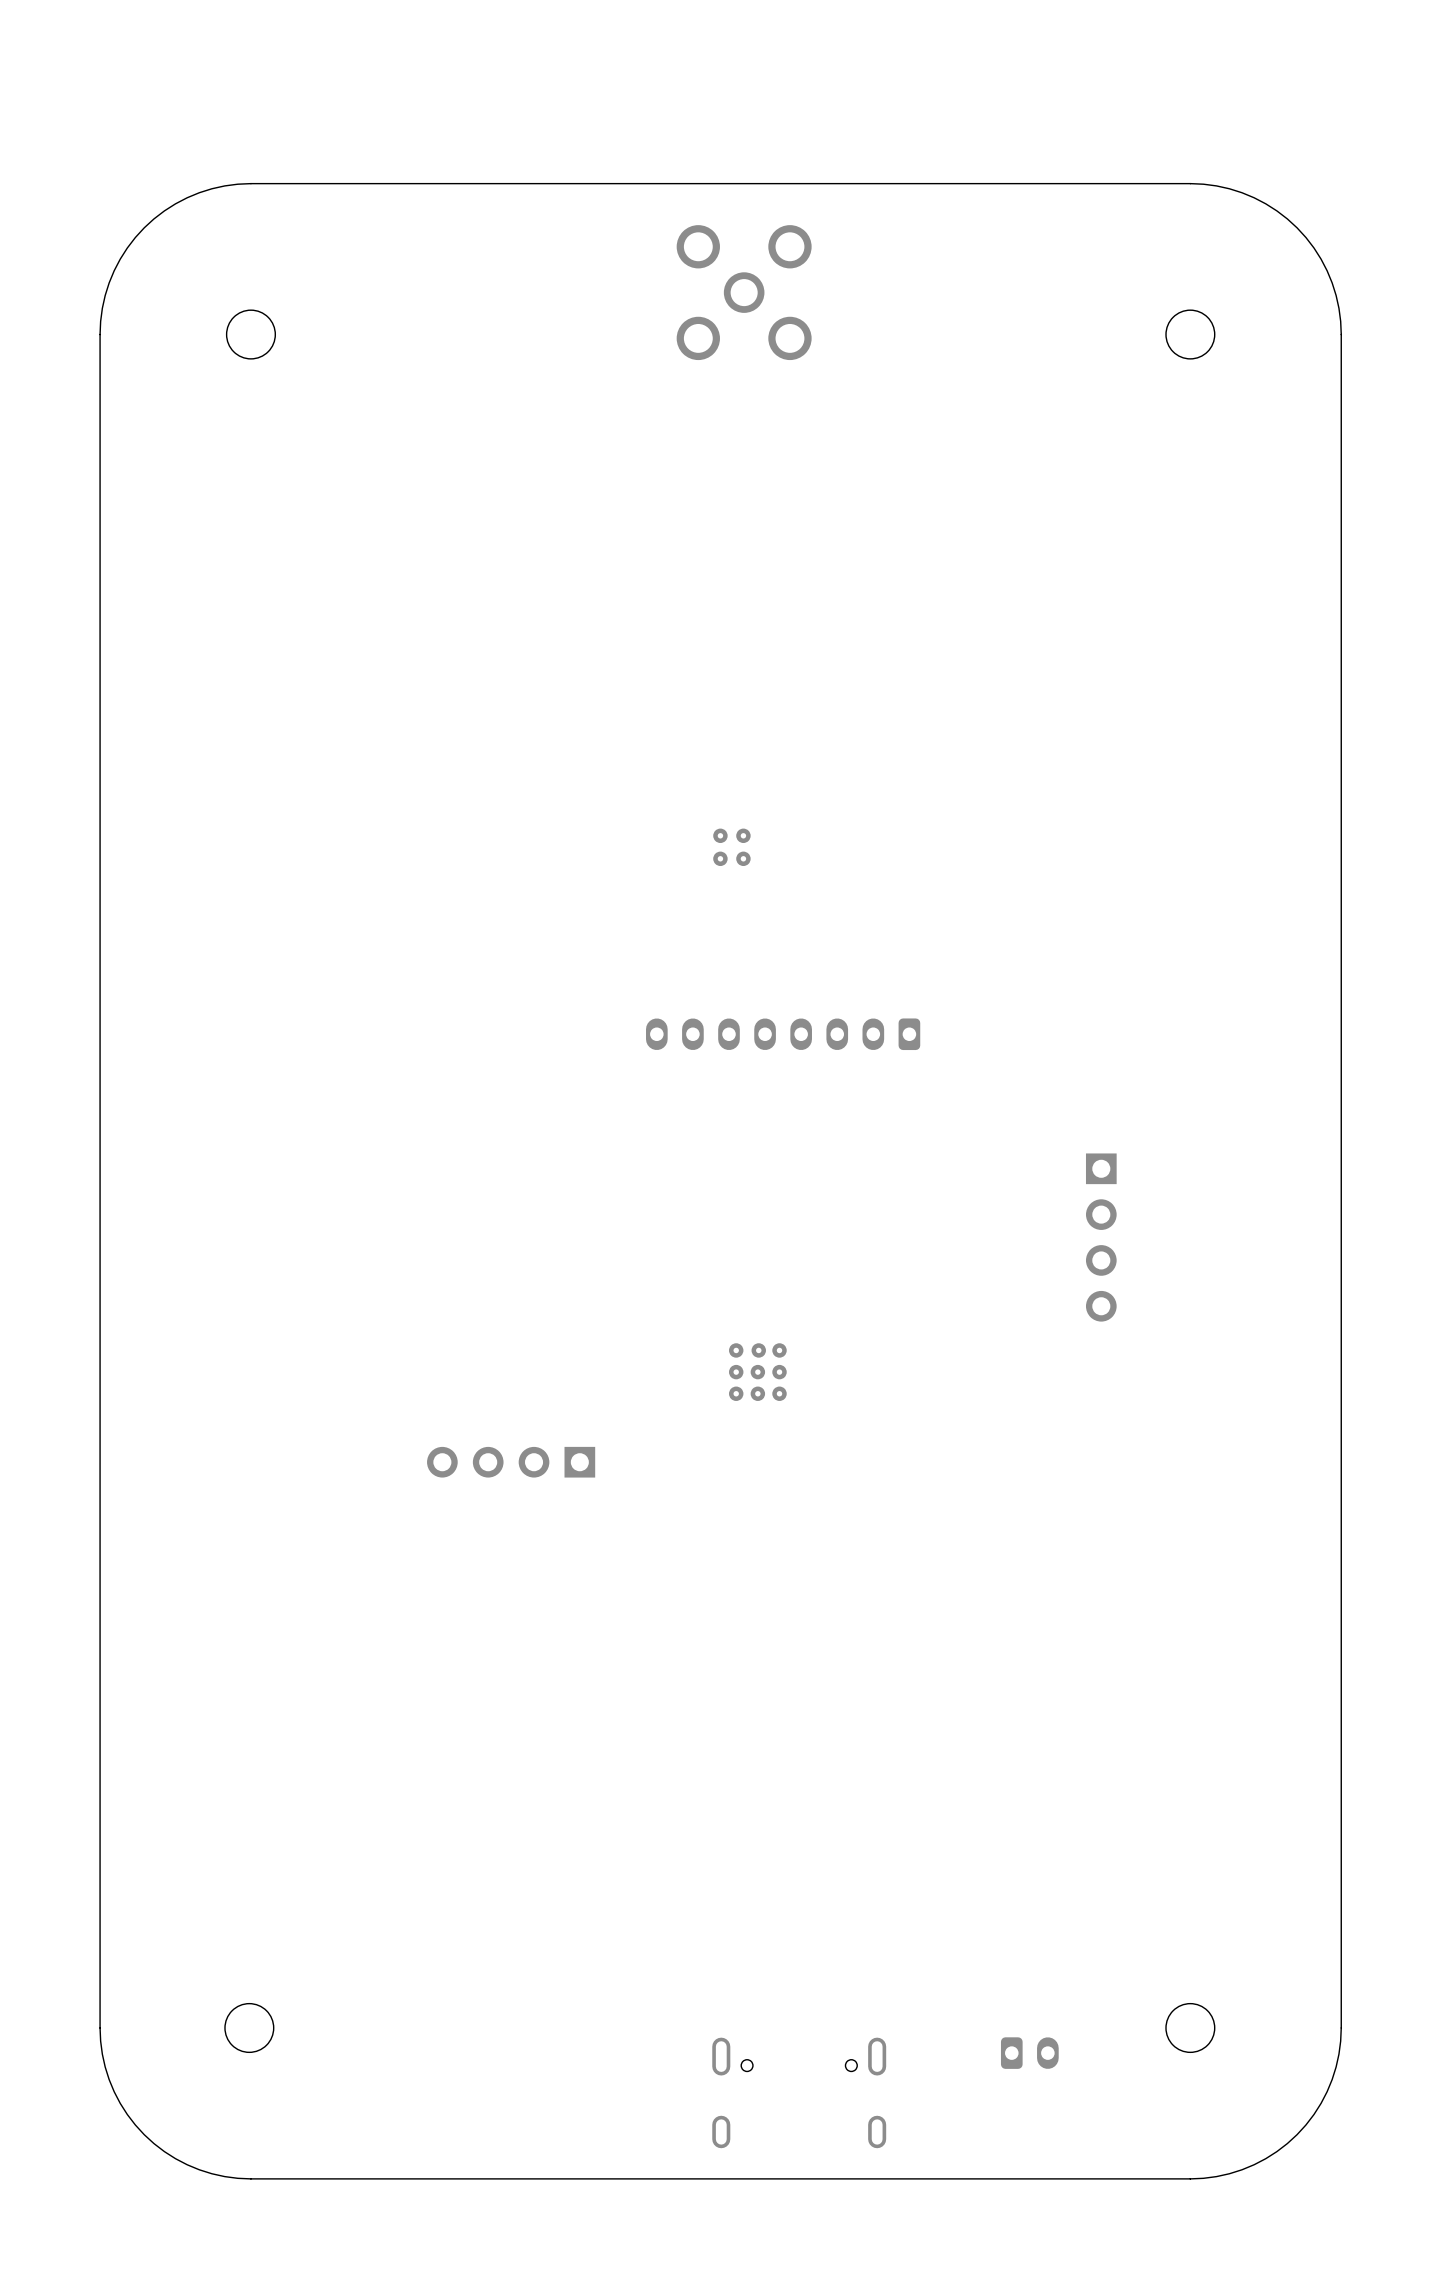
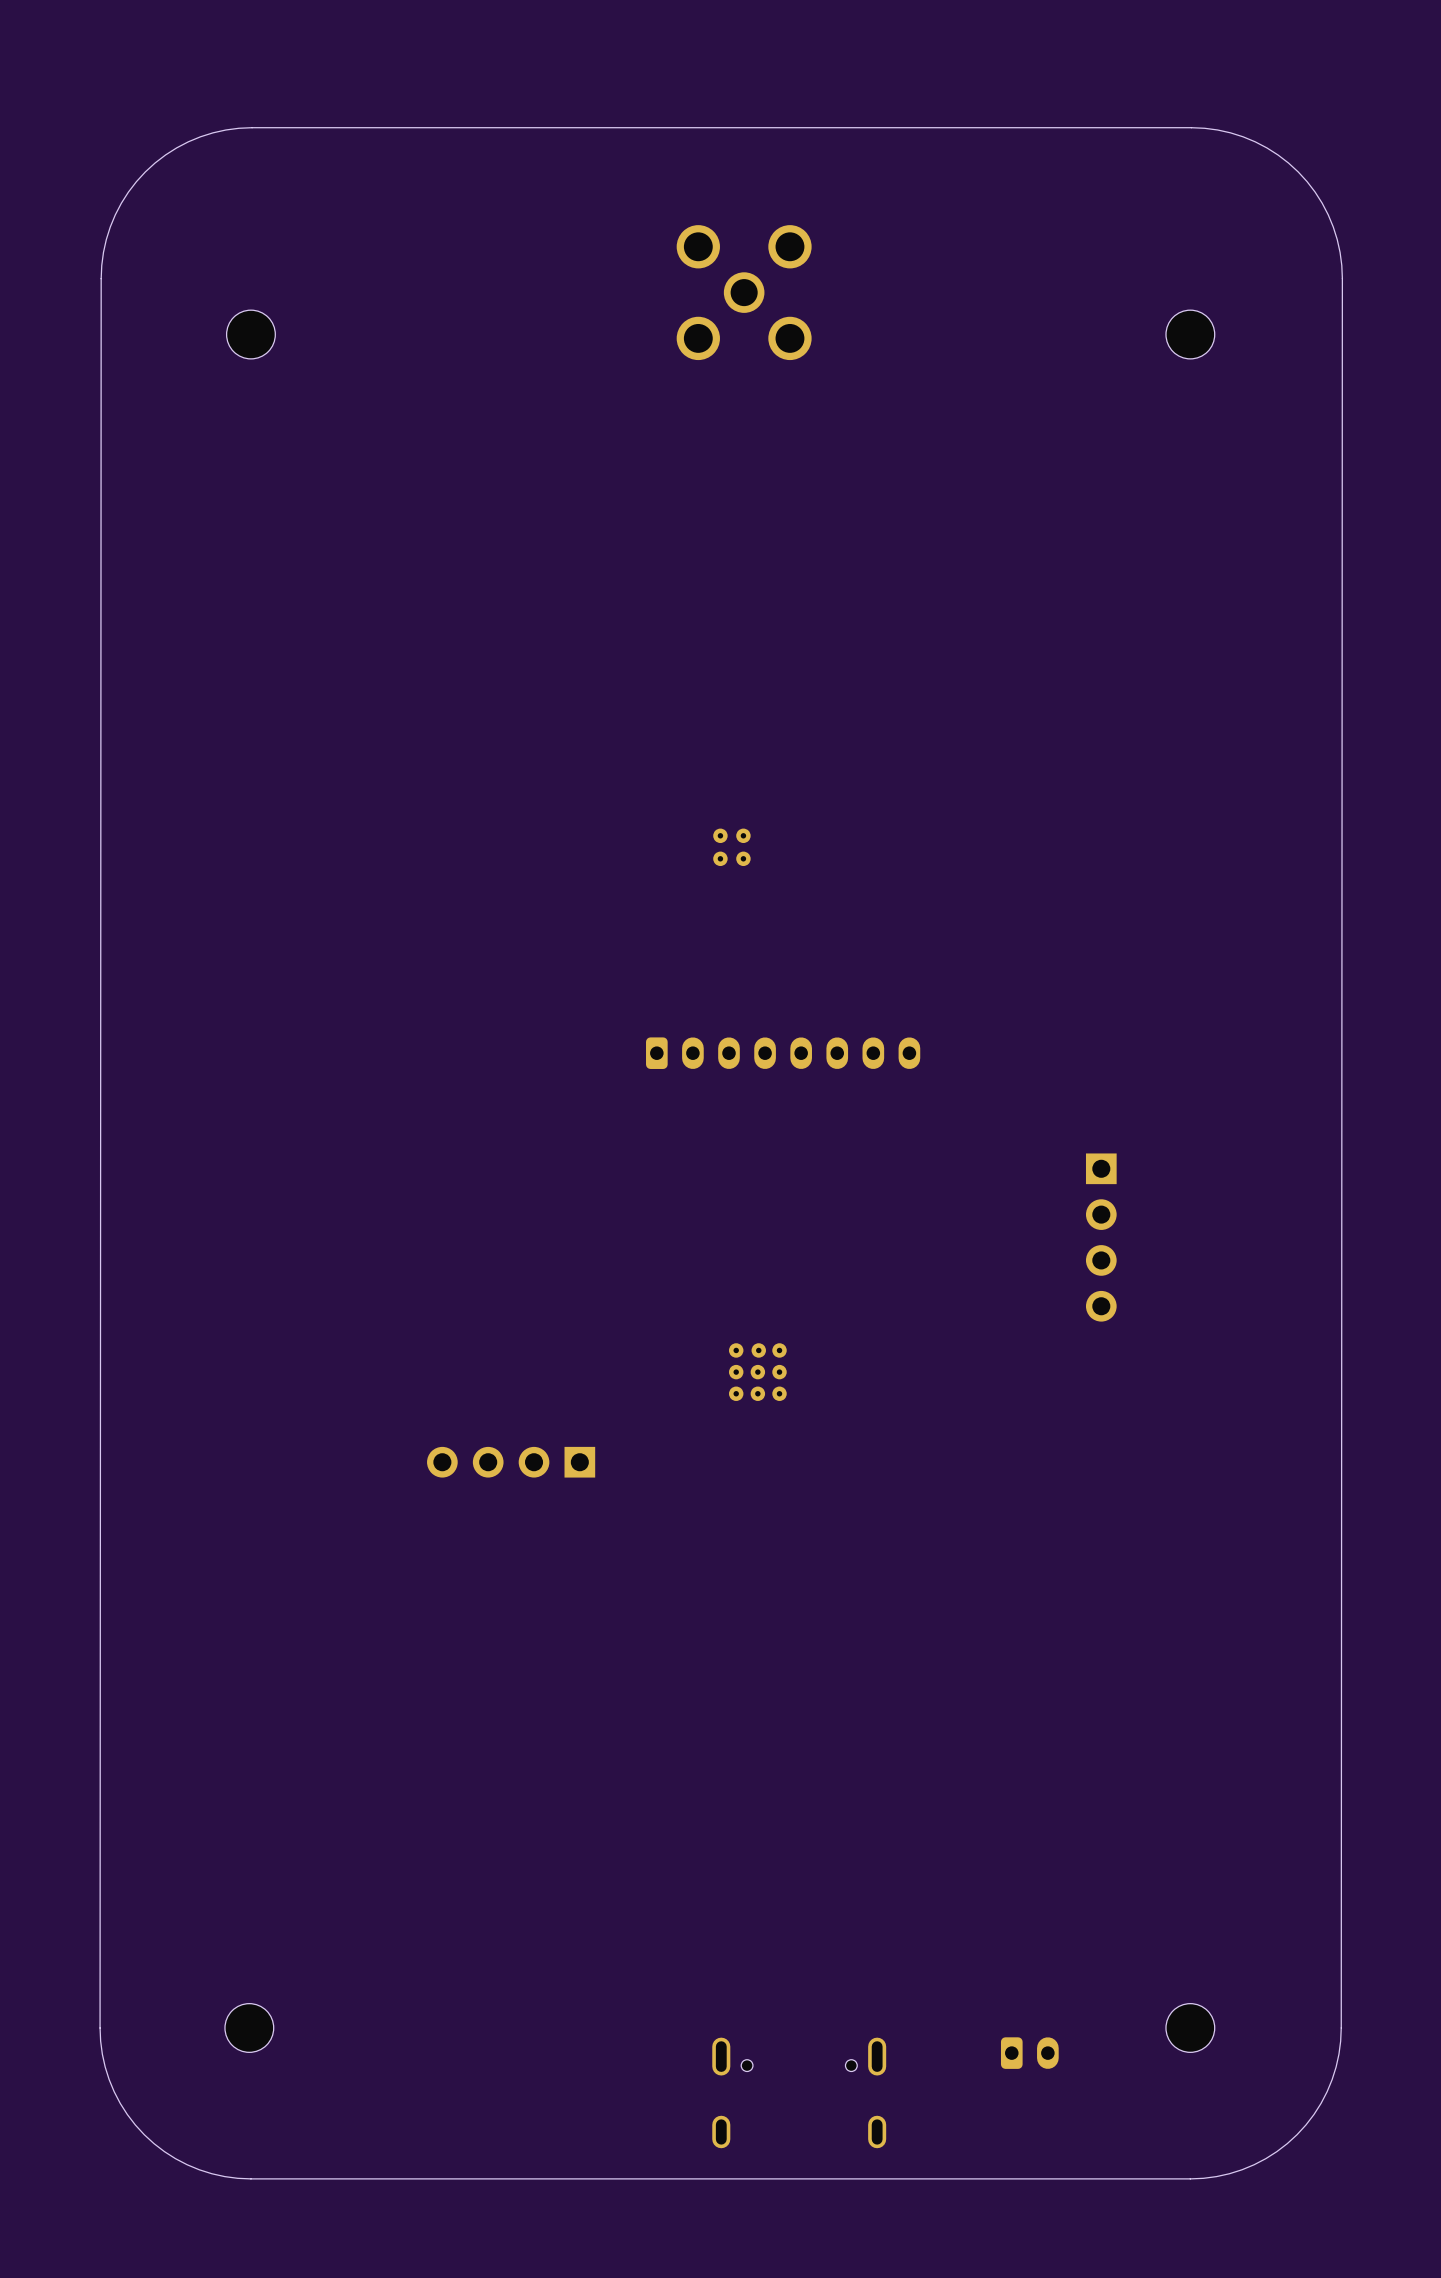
part rotation: 0° (783, 1034) -> 180° (783, 1053)
board edge: (1341, 2027) (1341, 334) (1336, 295) (1321, 259) (1297, 227) (1265, 203) (1229, 188) (1203, 184) (250, 183) (224, 185) (199, 192) (175, 203) (153, 218) (135, 237) (120, 259) (105, 295) (100, 321) (100, 2027) -> (1341, 2027) (1342, 278) (1337, 239) (1322, 203) (1307, 181) (1278, 154) (1243, 136) (1204, 128) (252, 127) (225, 129) (200, 136) (176, 147) (155, 163) (136, 181) (121, 203) (110, 226) (101, 265) (100, 2027)

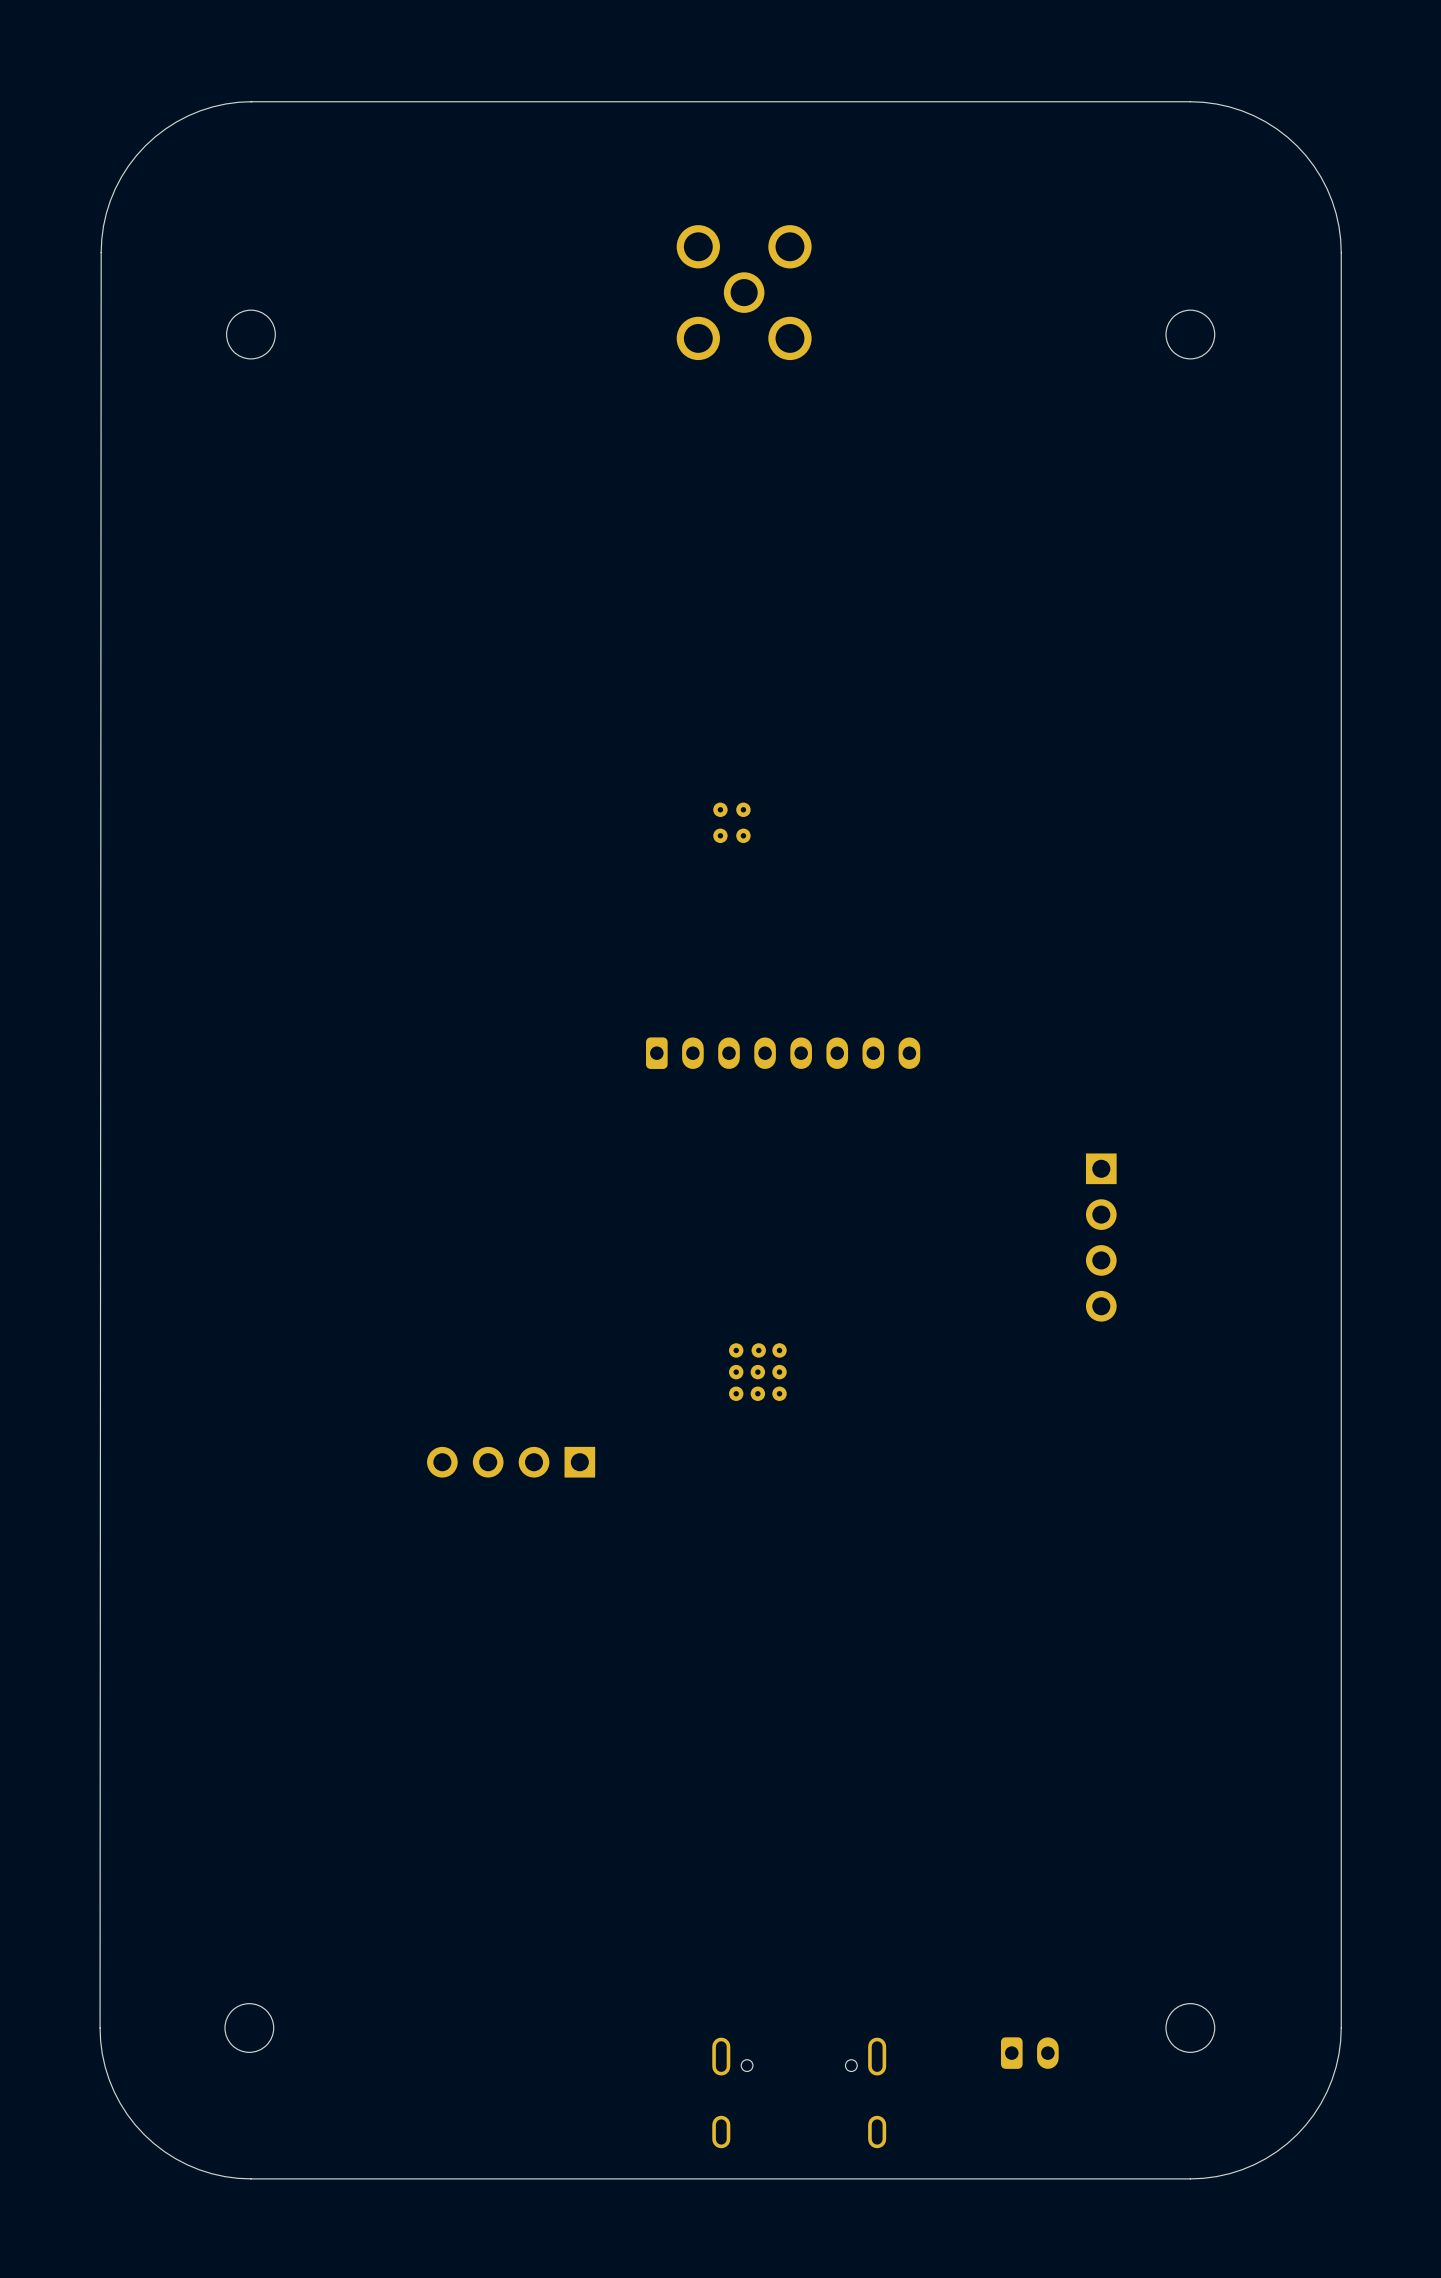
board edge: none -> (252, 101) (213, 106) (188, 115) (165, 128) (136, 155) (115, 188) (106, 213) (101, 239) (101, 278)
board edge: (101, 278) (106, 239) (115, 214) (128, 192) (145, 171) (165, 154) (188, 141) (213, 132) (238, 128) (1204, 128) (1230, 132) (1266, 147) (1288, 163) (1315, 192) (1328, 214) (1337, 239) (1342, 278) (1341, 2027) -> (250, 101) (1203, 102) (1241, 110) (1276, 129) (1305, 155) (1321, 177) (1336, 213) (1341, 252) (1341, 2027)
part: none -> (720, 809)
part: none -> (743, 809)
part: (720, 858) -> none
part: (743, 858) -> none

